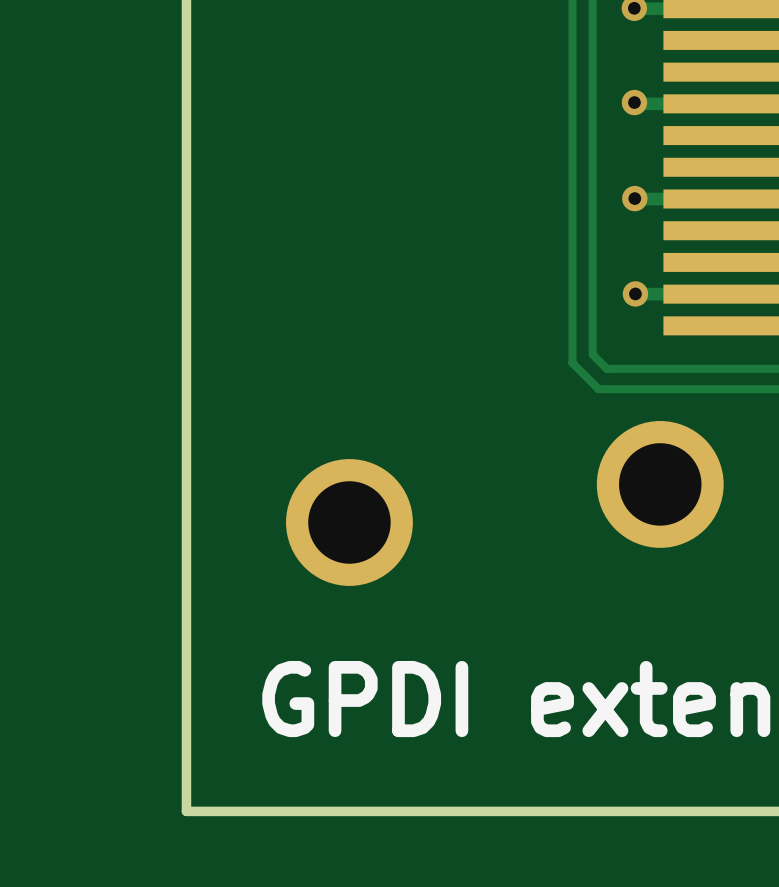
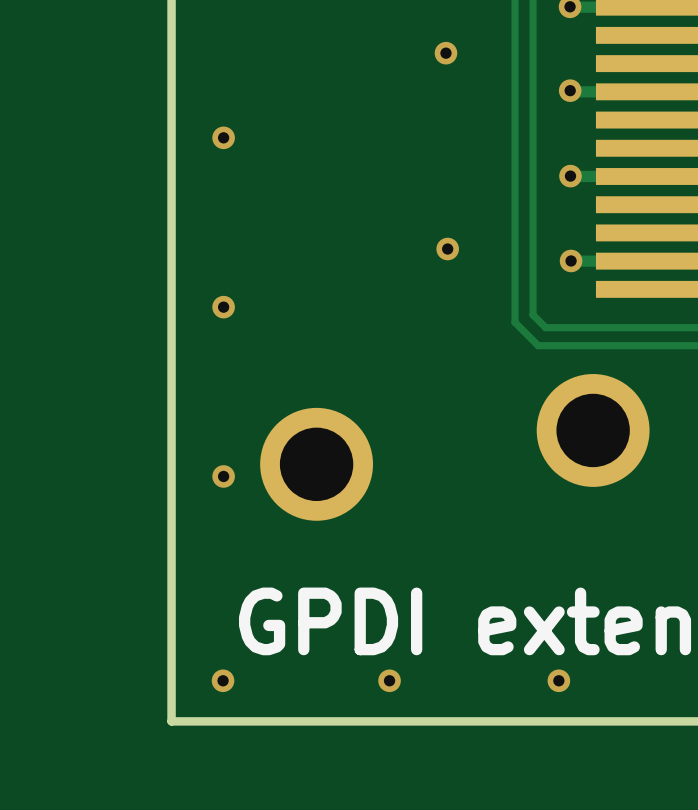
via: none -> (445, 53)
via: none -> (223, 137)
via: none -> (447, 249)
via: none -> (223, 307)
via: none -> (223, 476)
via: none -> (223, 680)
via: none -> (389, 680)
via: none -> (558, 680)

